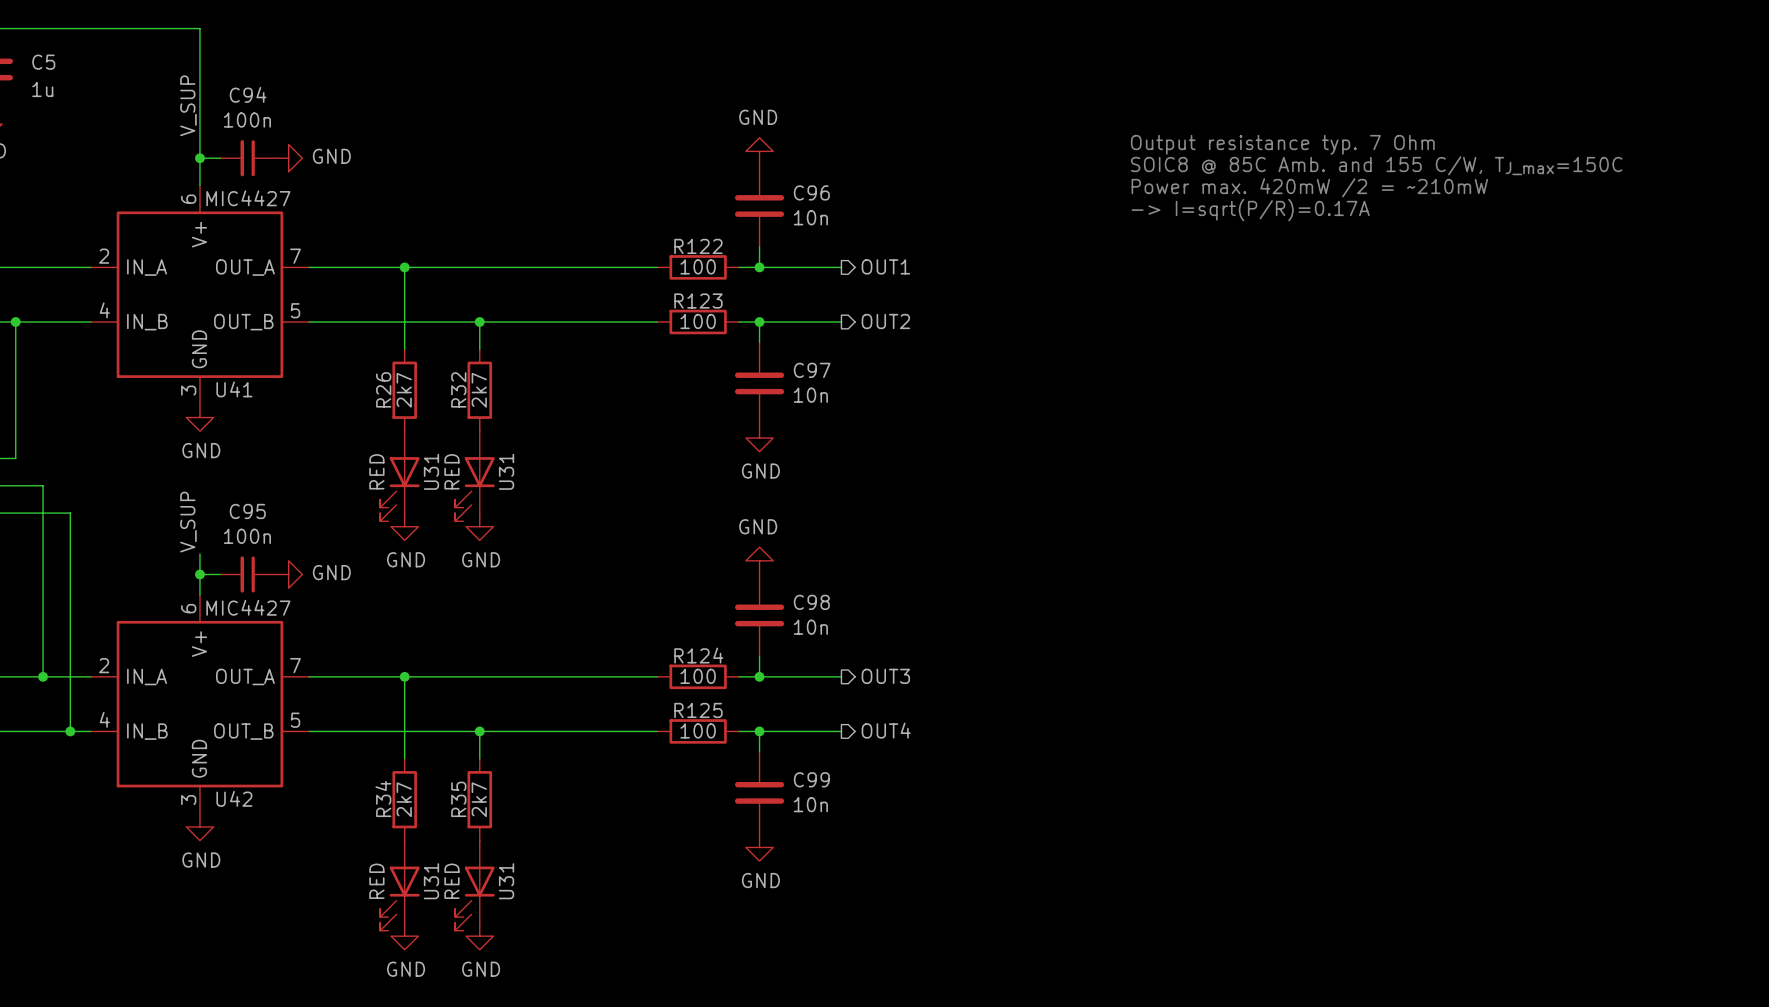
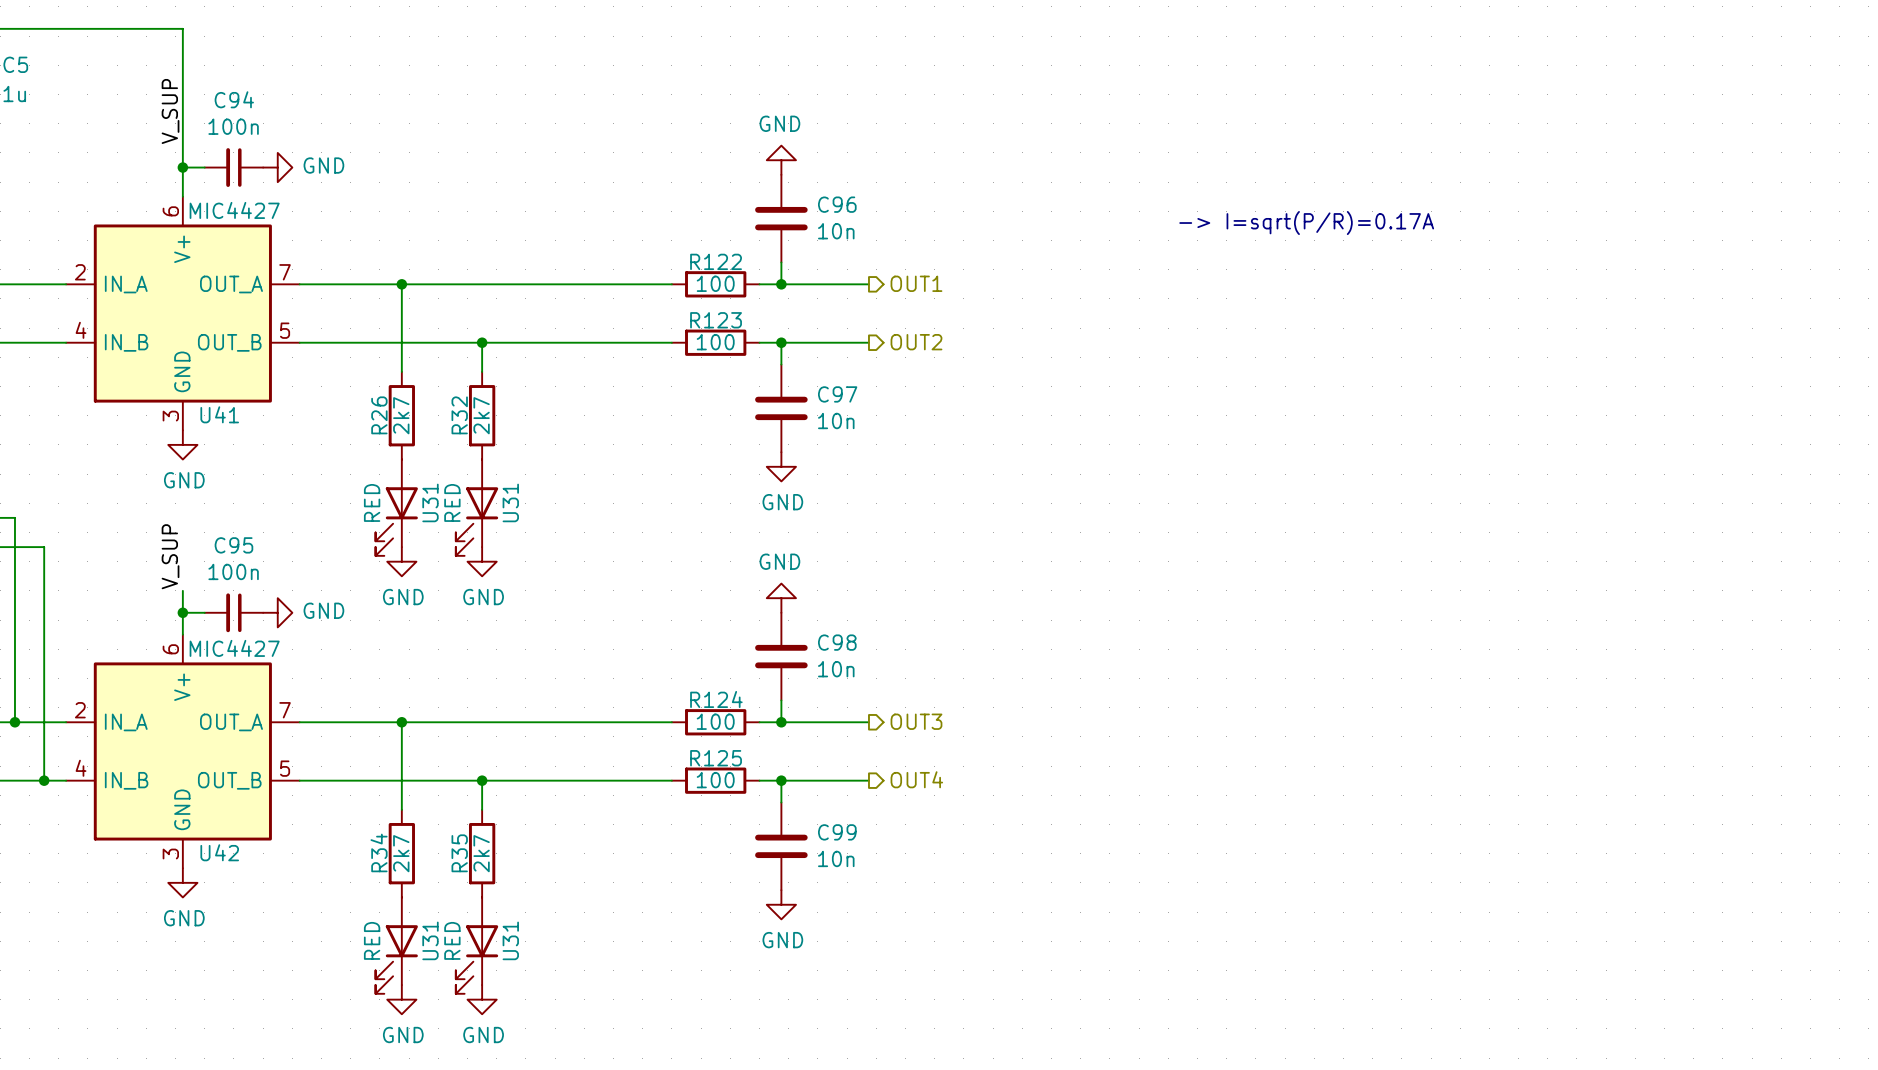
text: Output resistance typ. 7 Ohm (1282, 144) -> none
text: SOIC8 @ 85C Amb. and 155 C/W, TJ_max=150C (1376, 165) -> none
text: Power max. 420mW /2 = ~210mW (1309, 187) -> none

